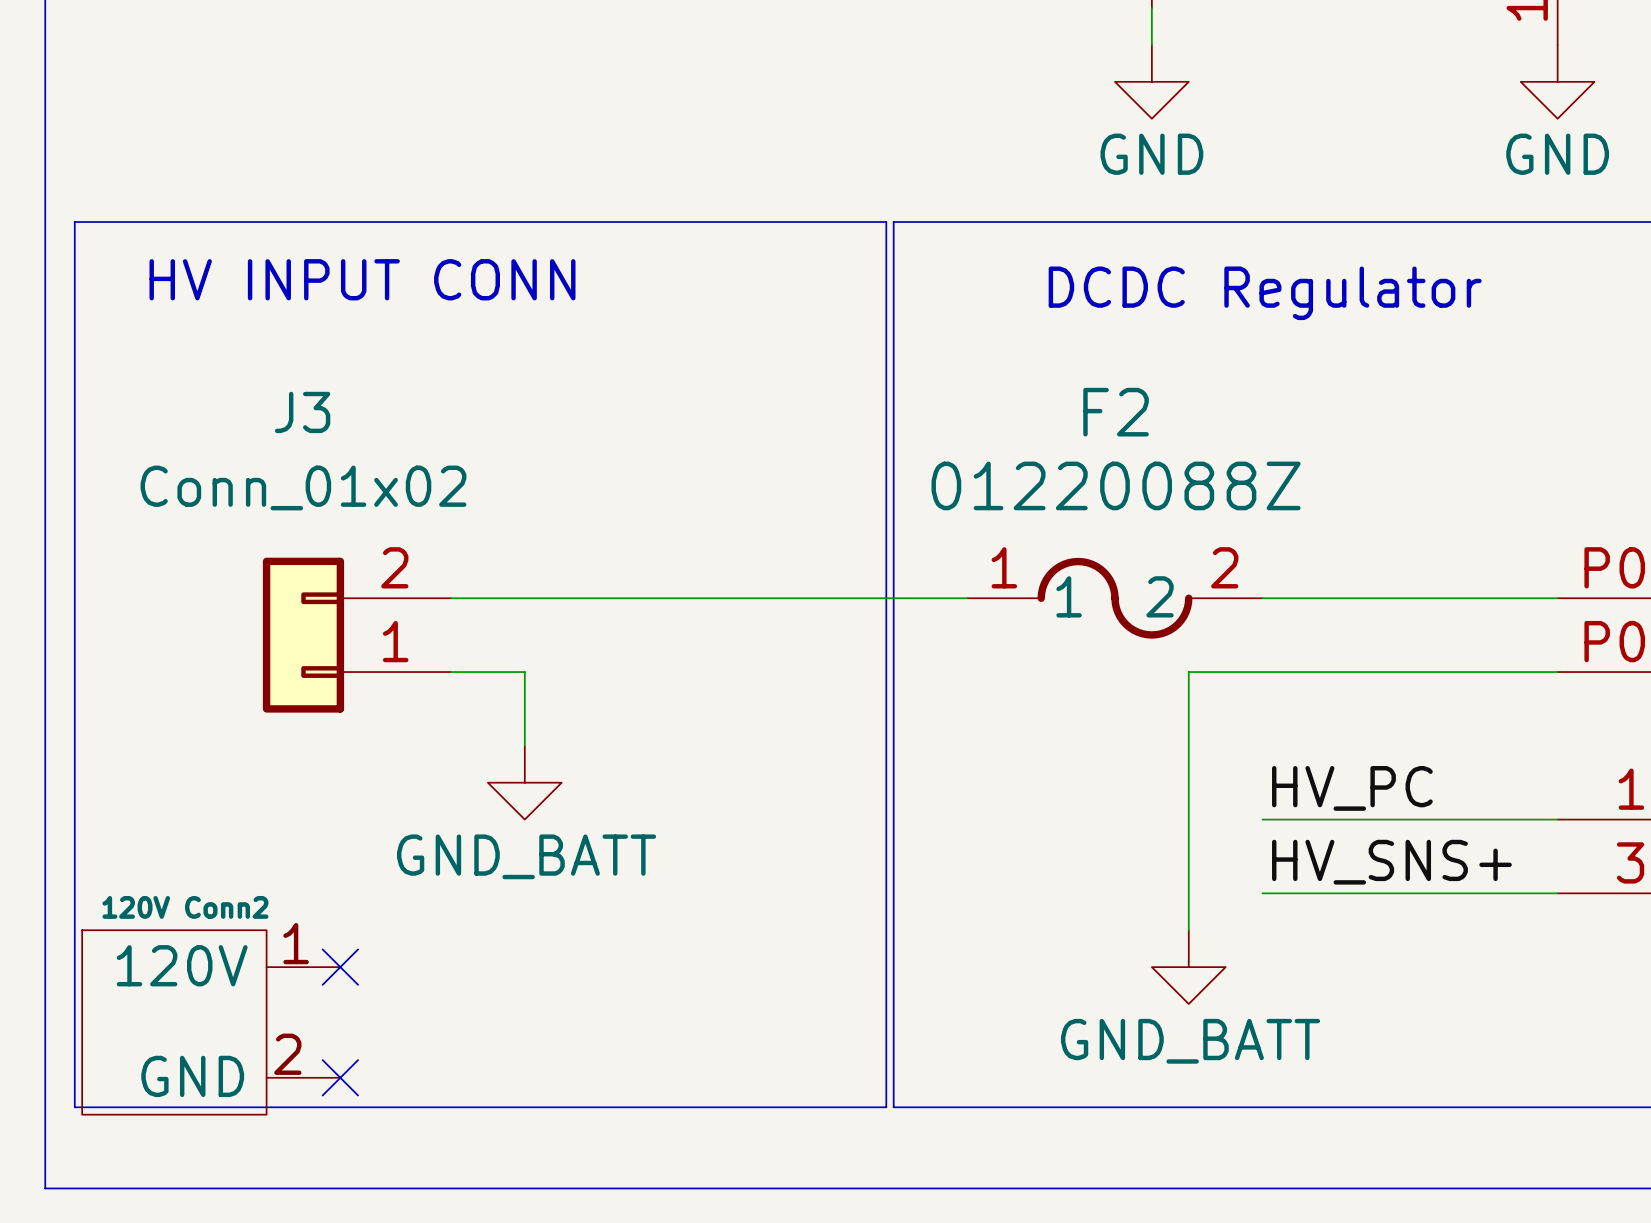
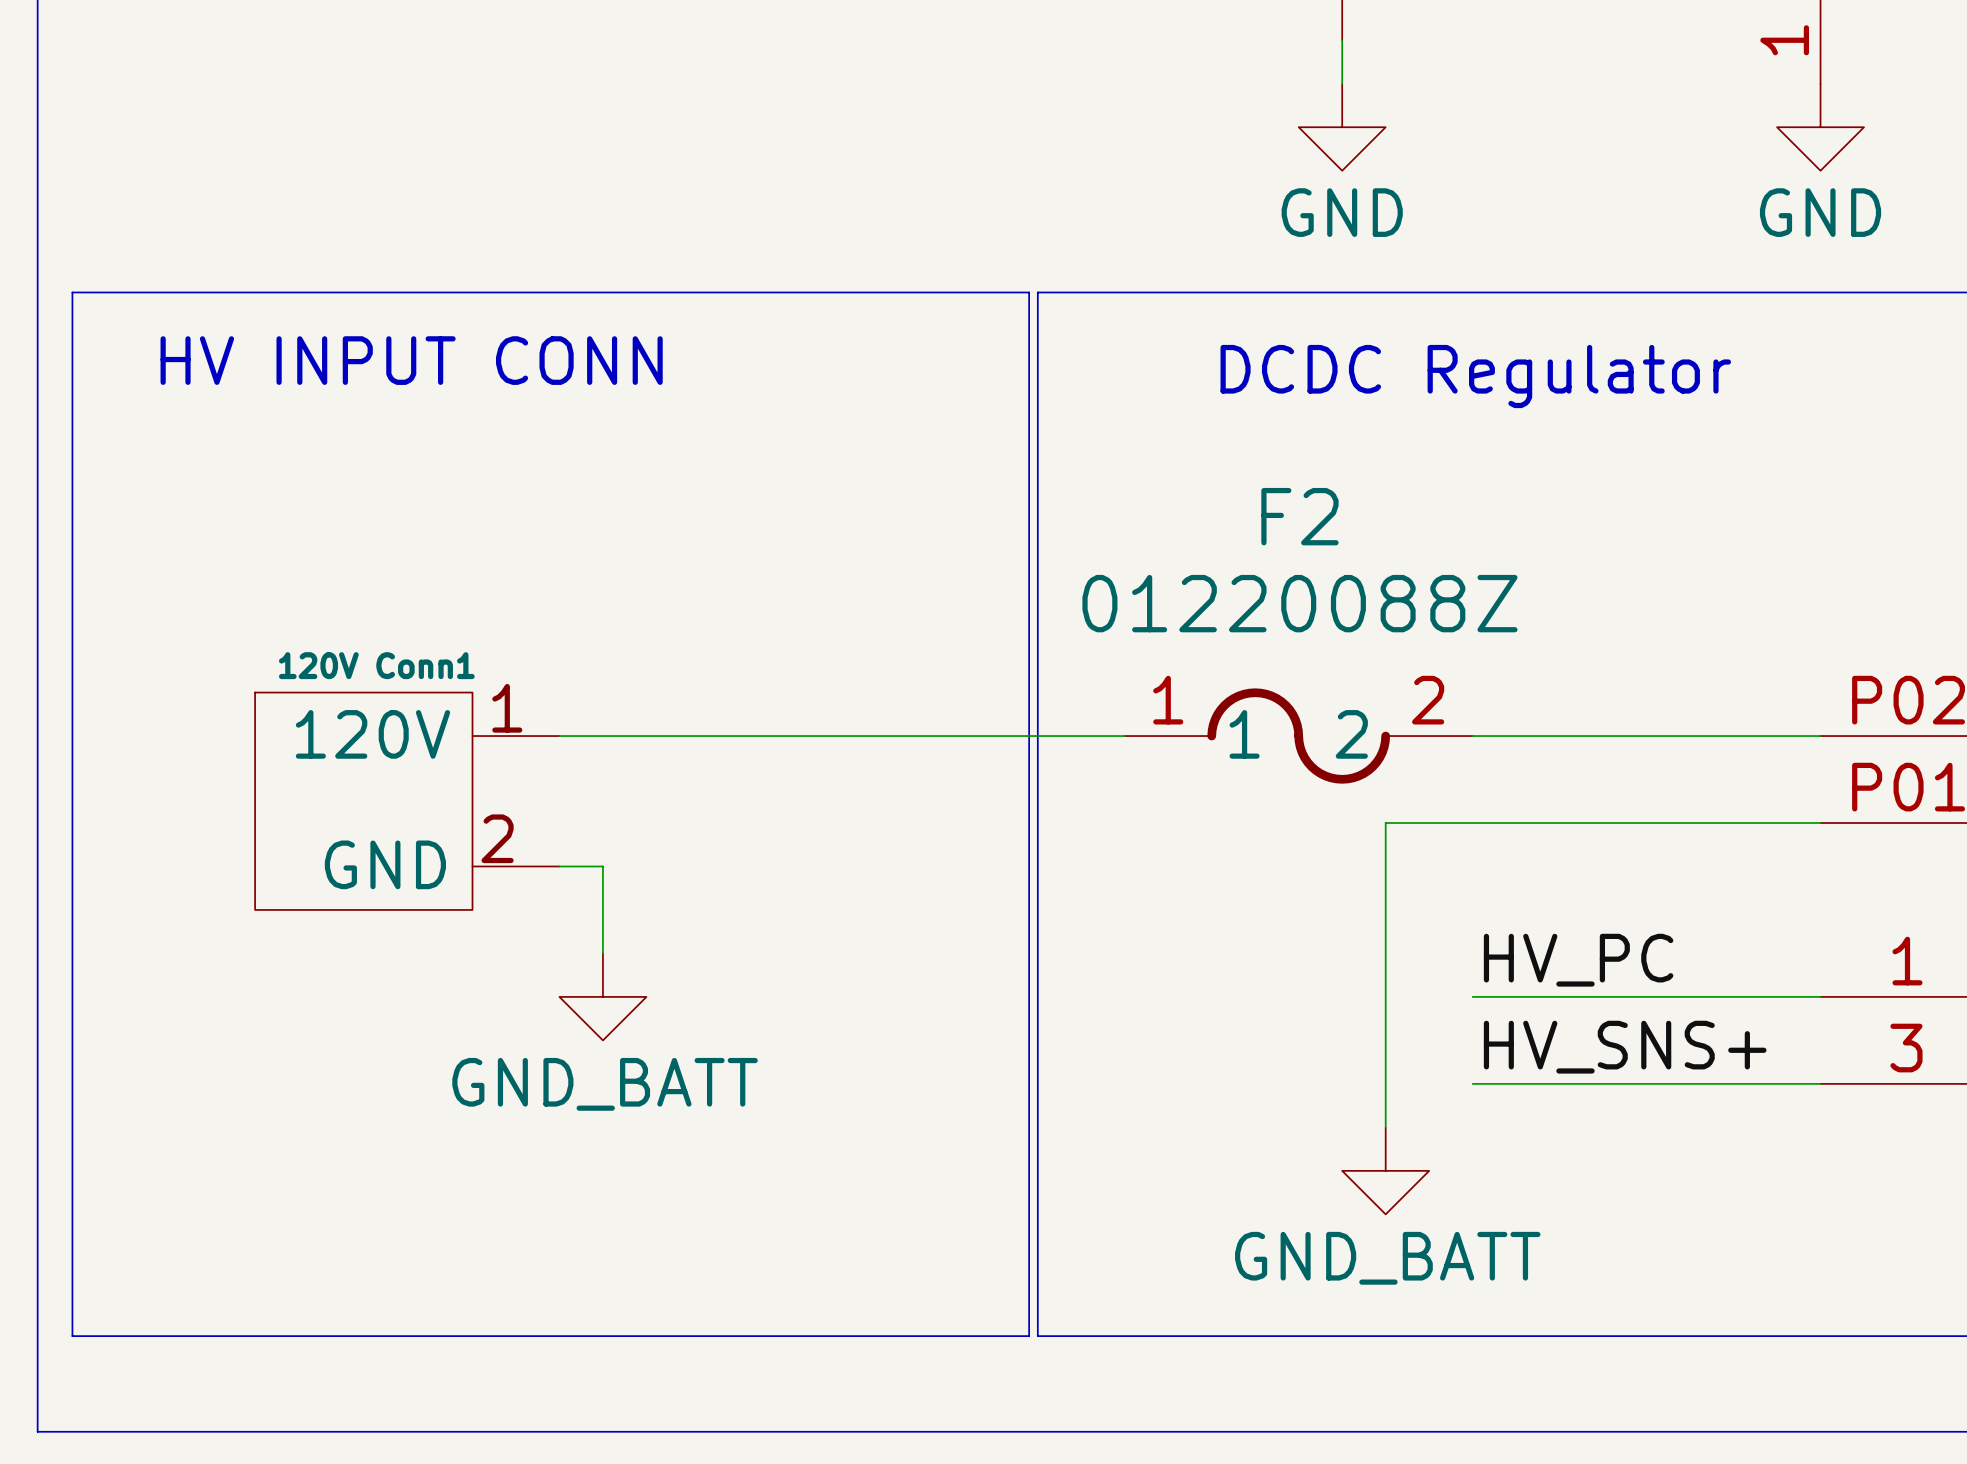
J3: Conn_01x02 (356, 635) -> none
120V Conn1: none -> (407, 801)
wire: (451, 672) (524, 672) (524, 708) -> (559, 866) (602, 866)
power symbol position: GND_BATT (524, 782) -> GND_BATT (602, 996)
no-connect mark: (340, 967) -> none
120V Conn2: (211, 1022) -> none
no-connect mark: (340, 1077) -> none

